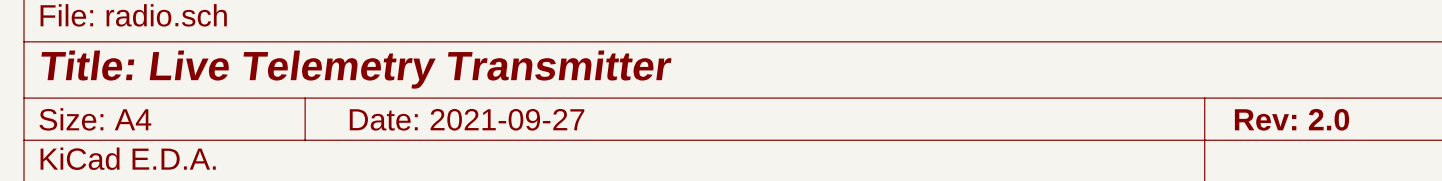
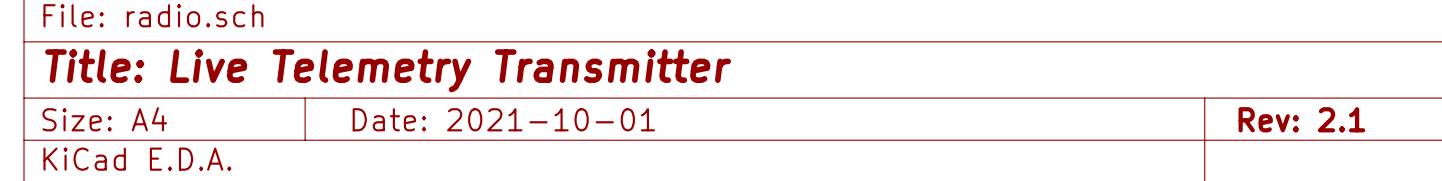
title block: Date: 2021-09-27 (467, 119) -> Date: 2021-10-01 (503, 119)
title block: Rev: 2.0 (1292, 119) -> Rev: 2.1 (1301, 119)

